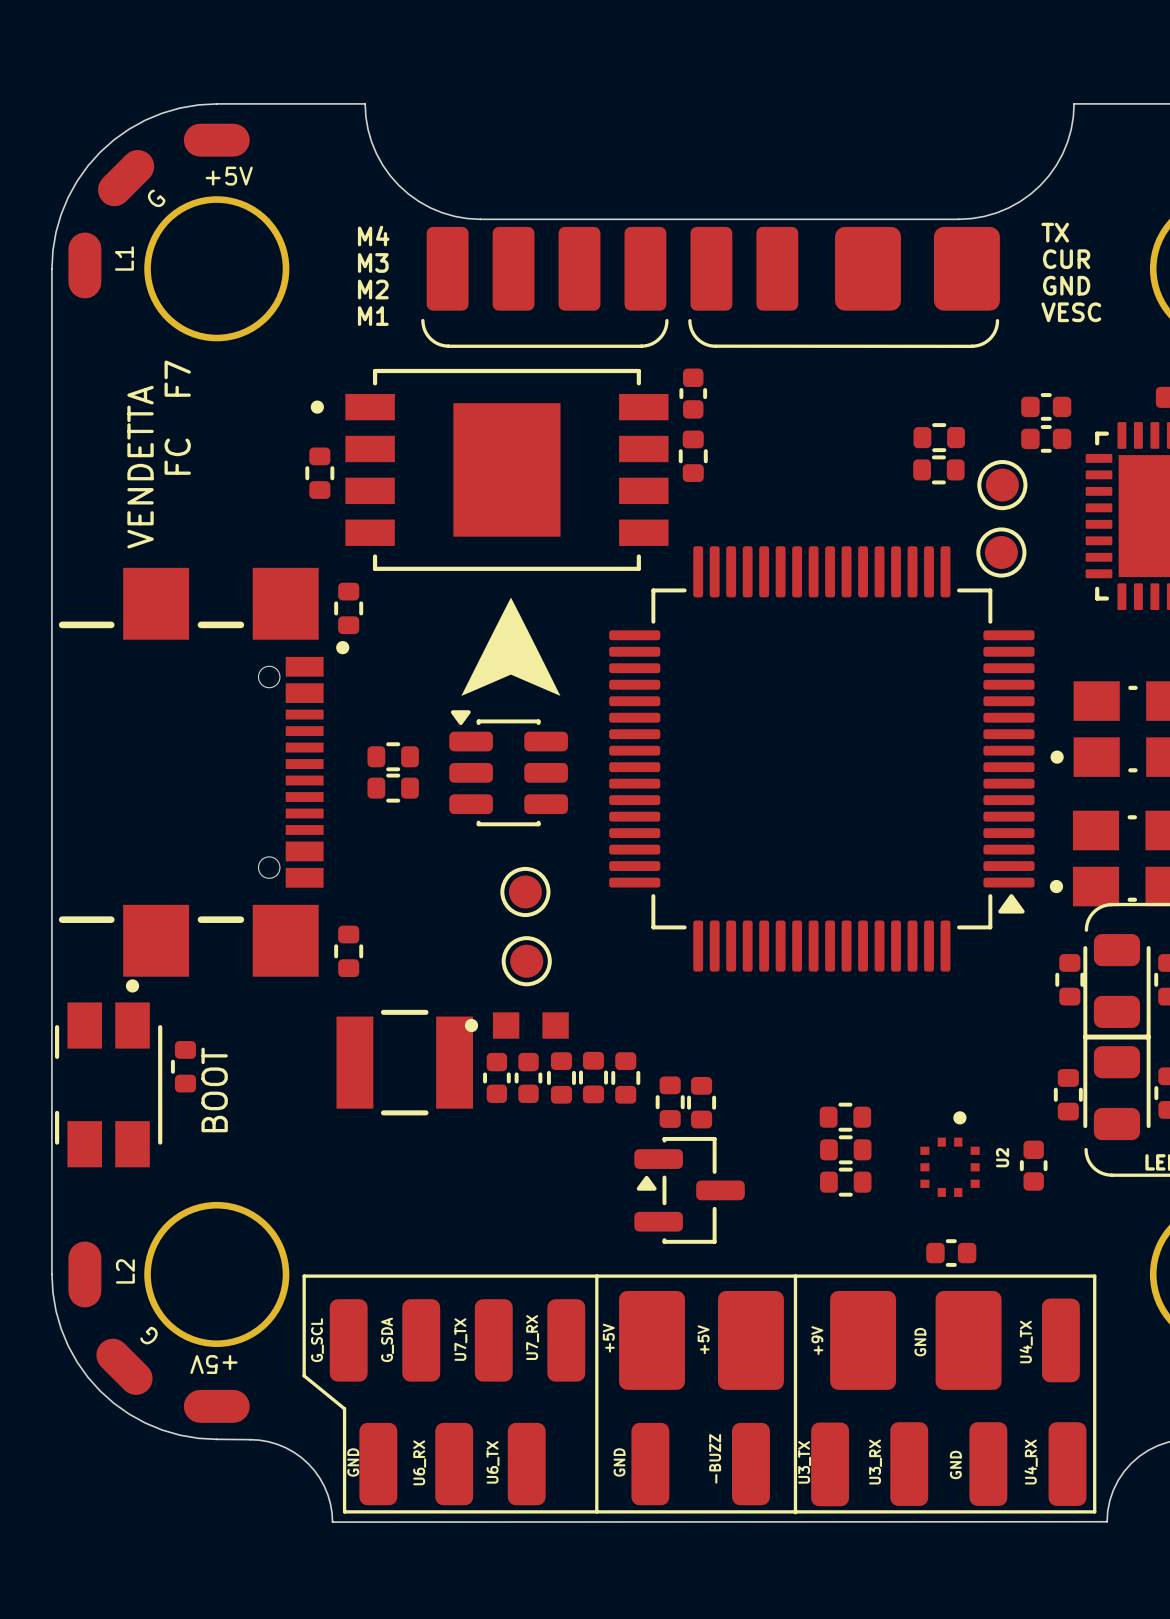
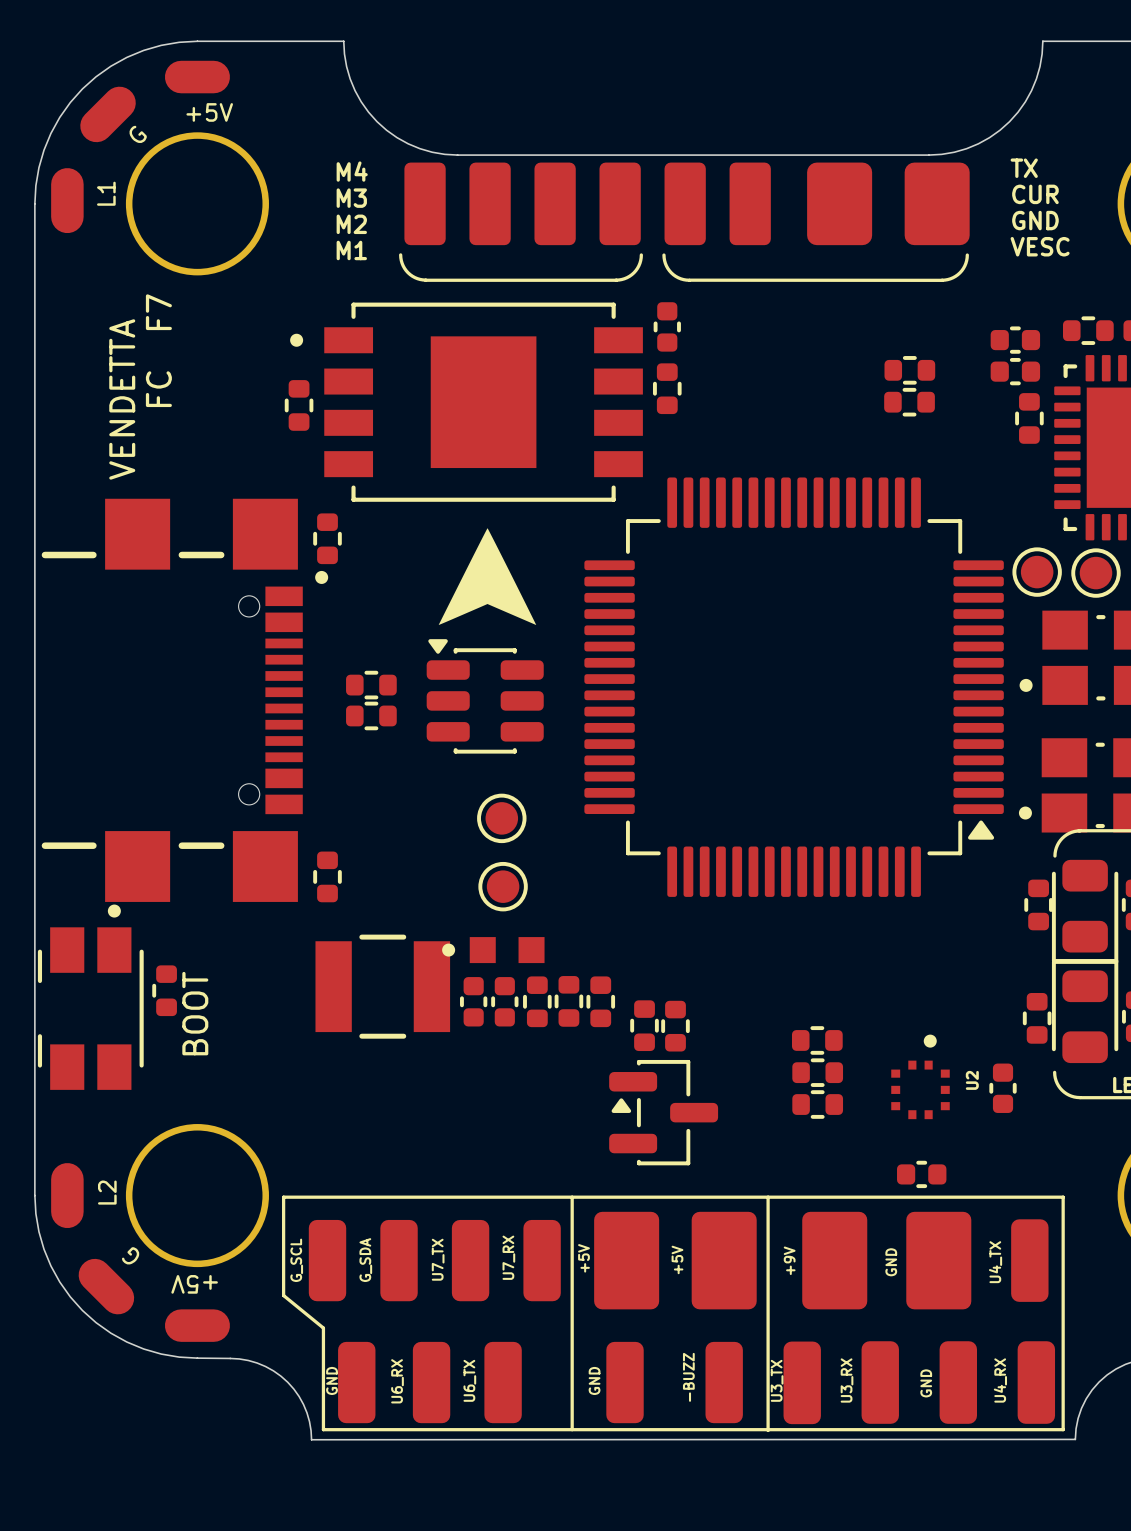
part: none -> (1088, 330)
part: (1002, 485) -> none
part: none -> (1029, 418)
part: (1001, 552) -> none
part: none -> (1037, 572)
part: none -> (1096, 573)

